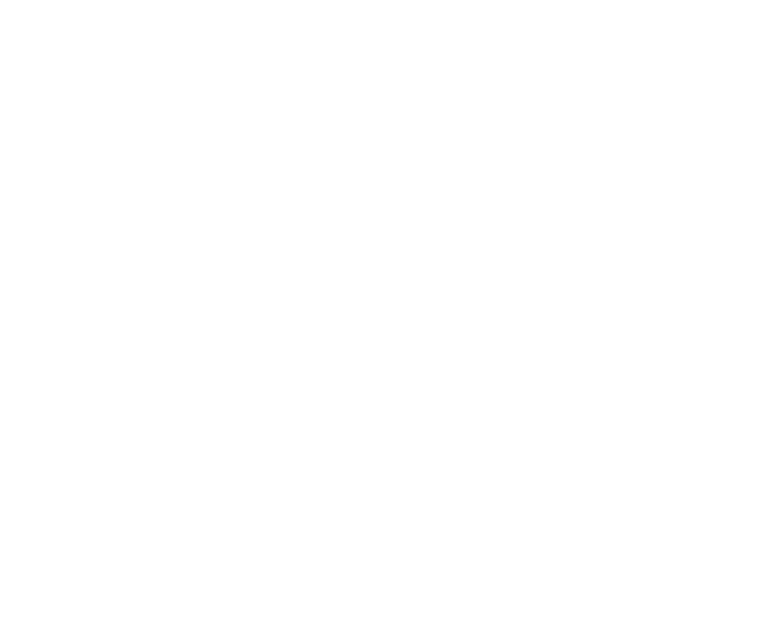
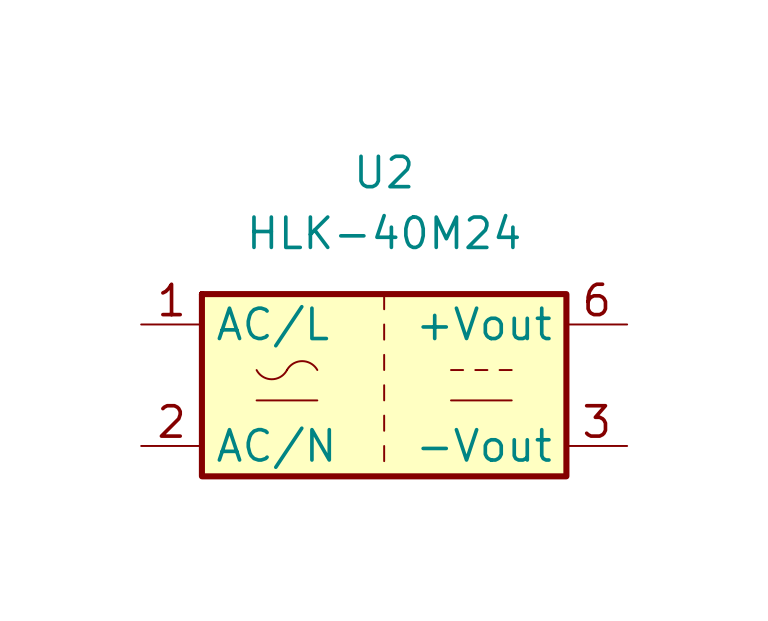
U2: none -> HLK-40M24 (384, 385)

